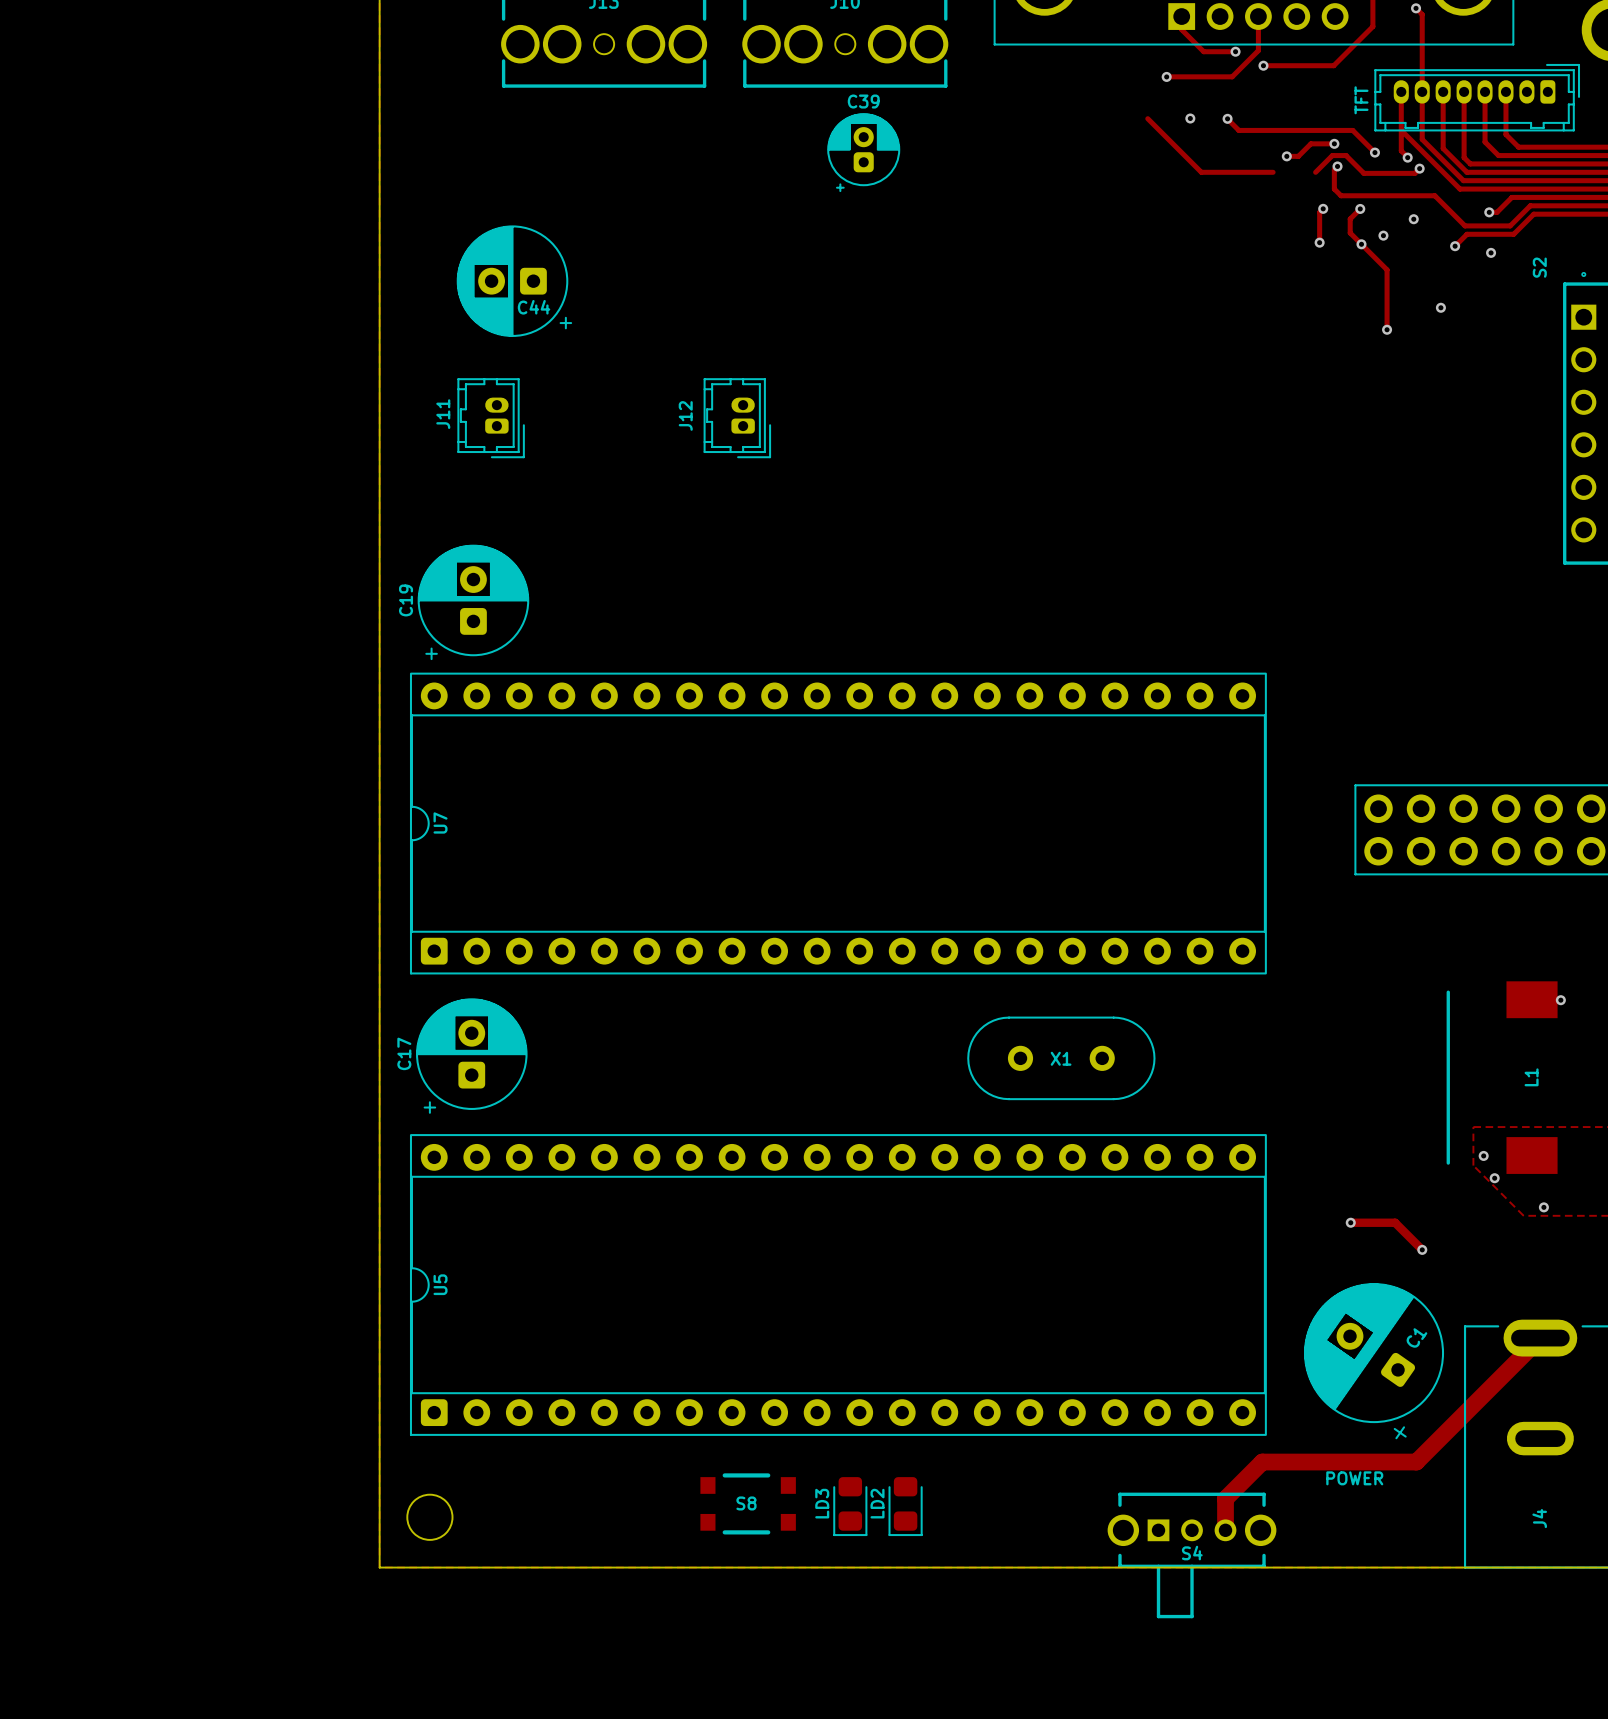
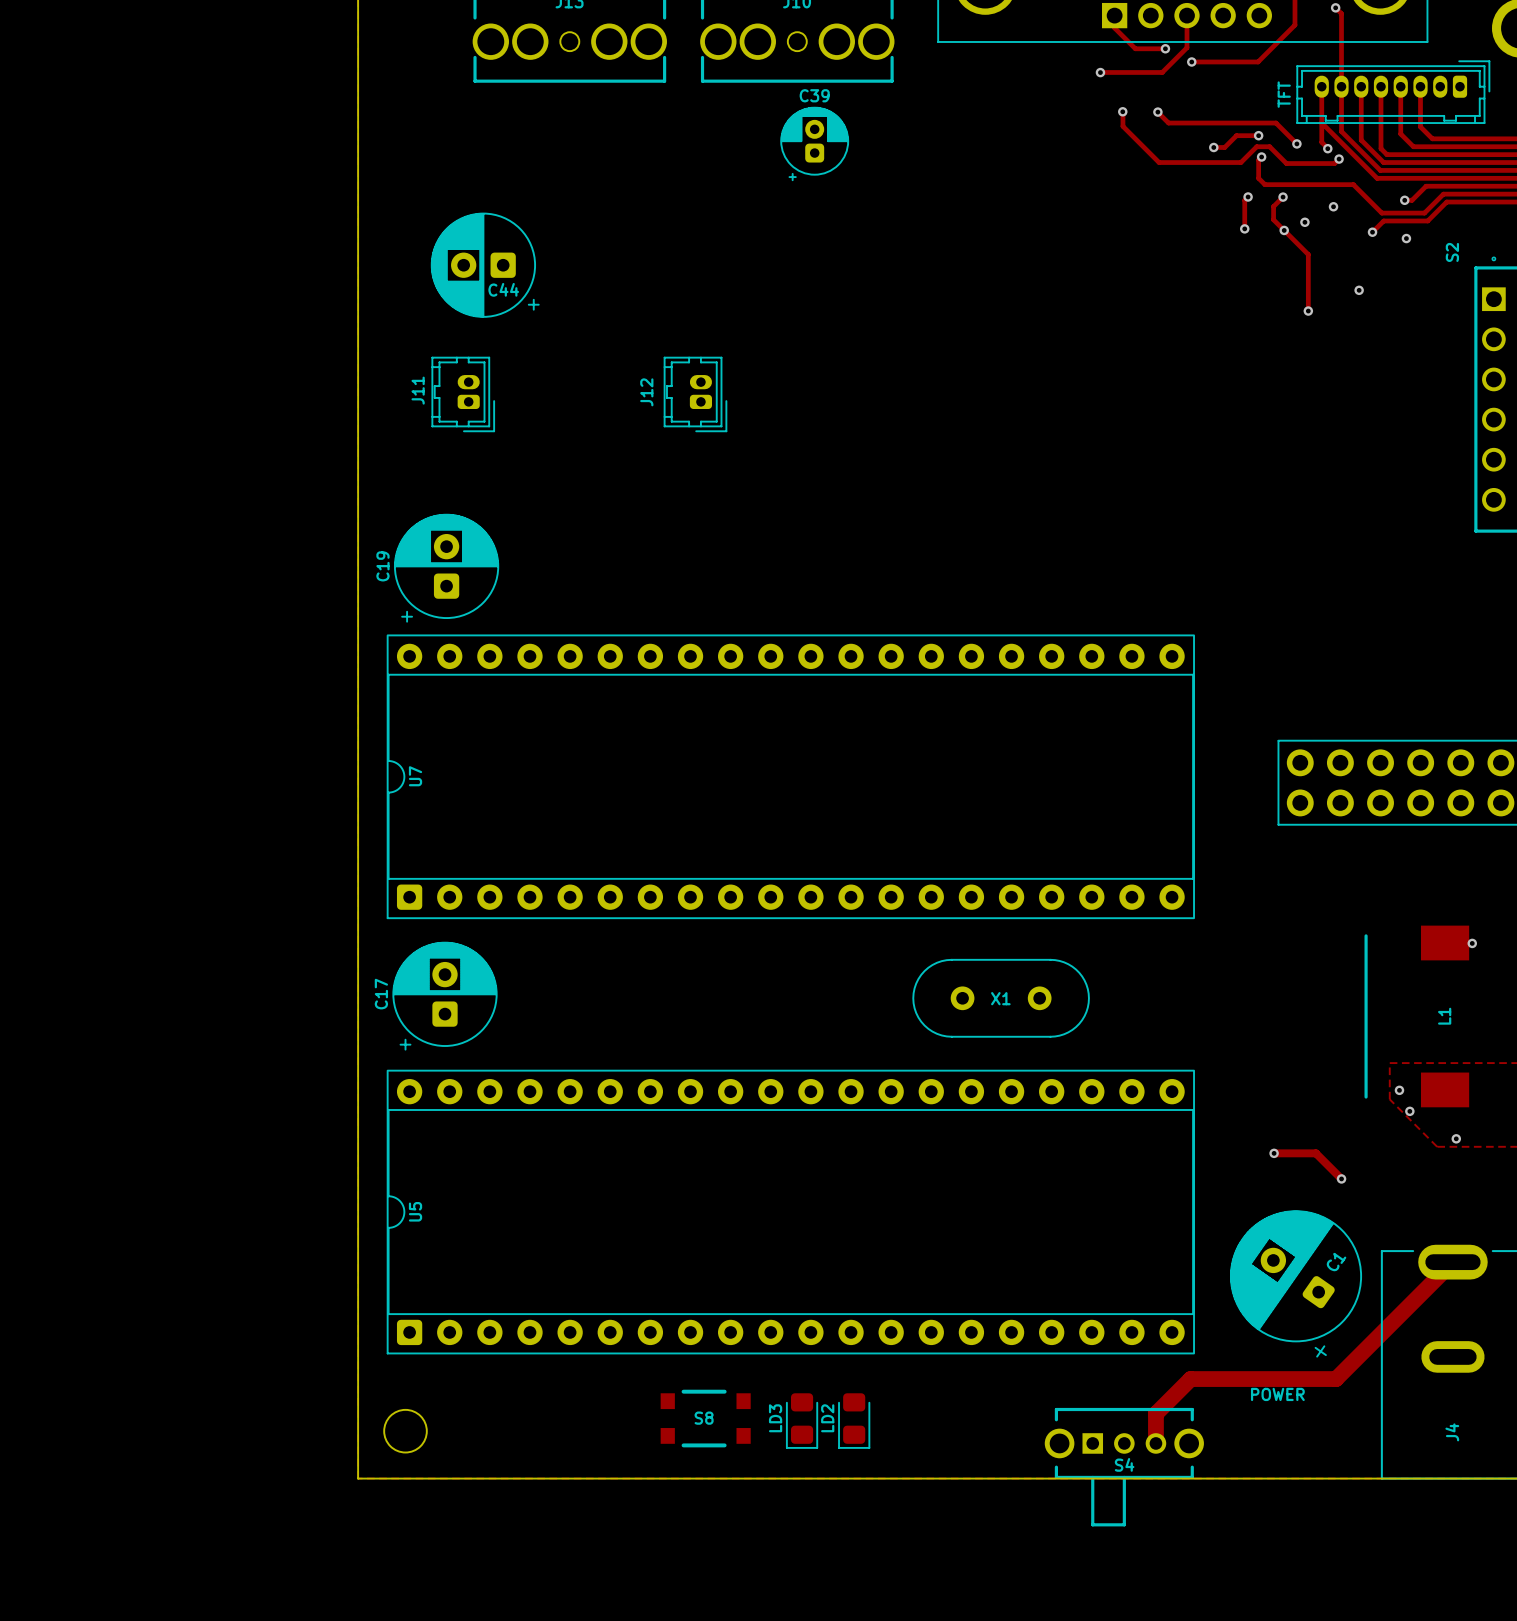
track: (1147, 118) (1201, 172) (1228, 172) -> (1122, 111) (1122, 126) (1159, 162)
track: none -> (1200, 162) (1240, 162)

